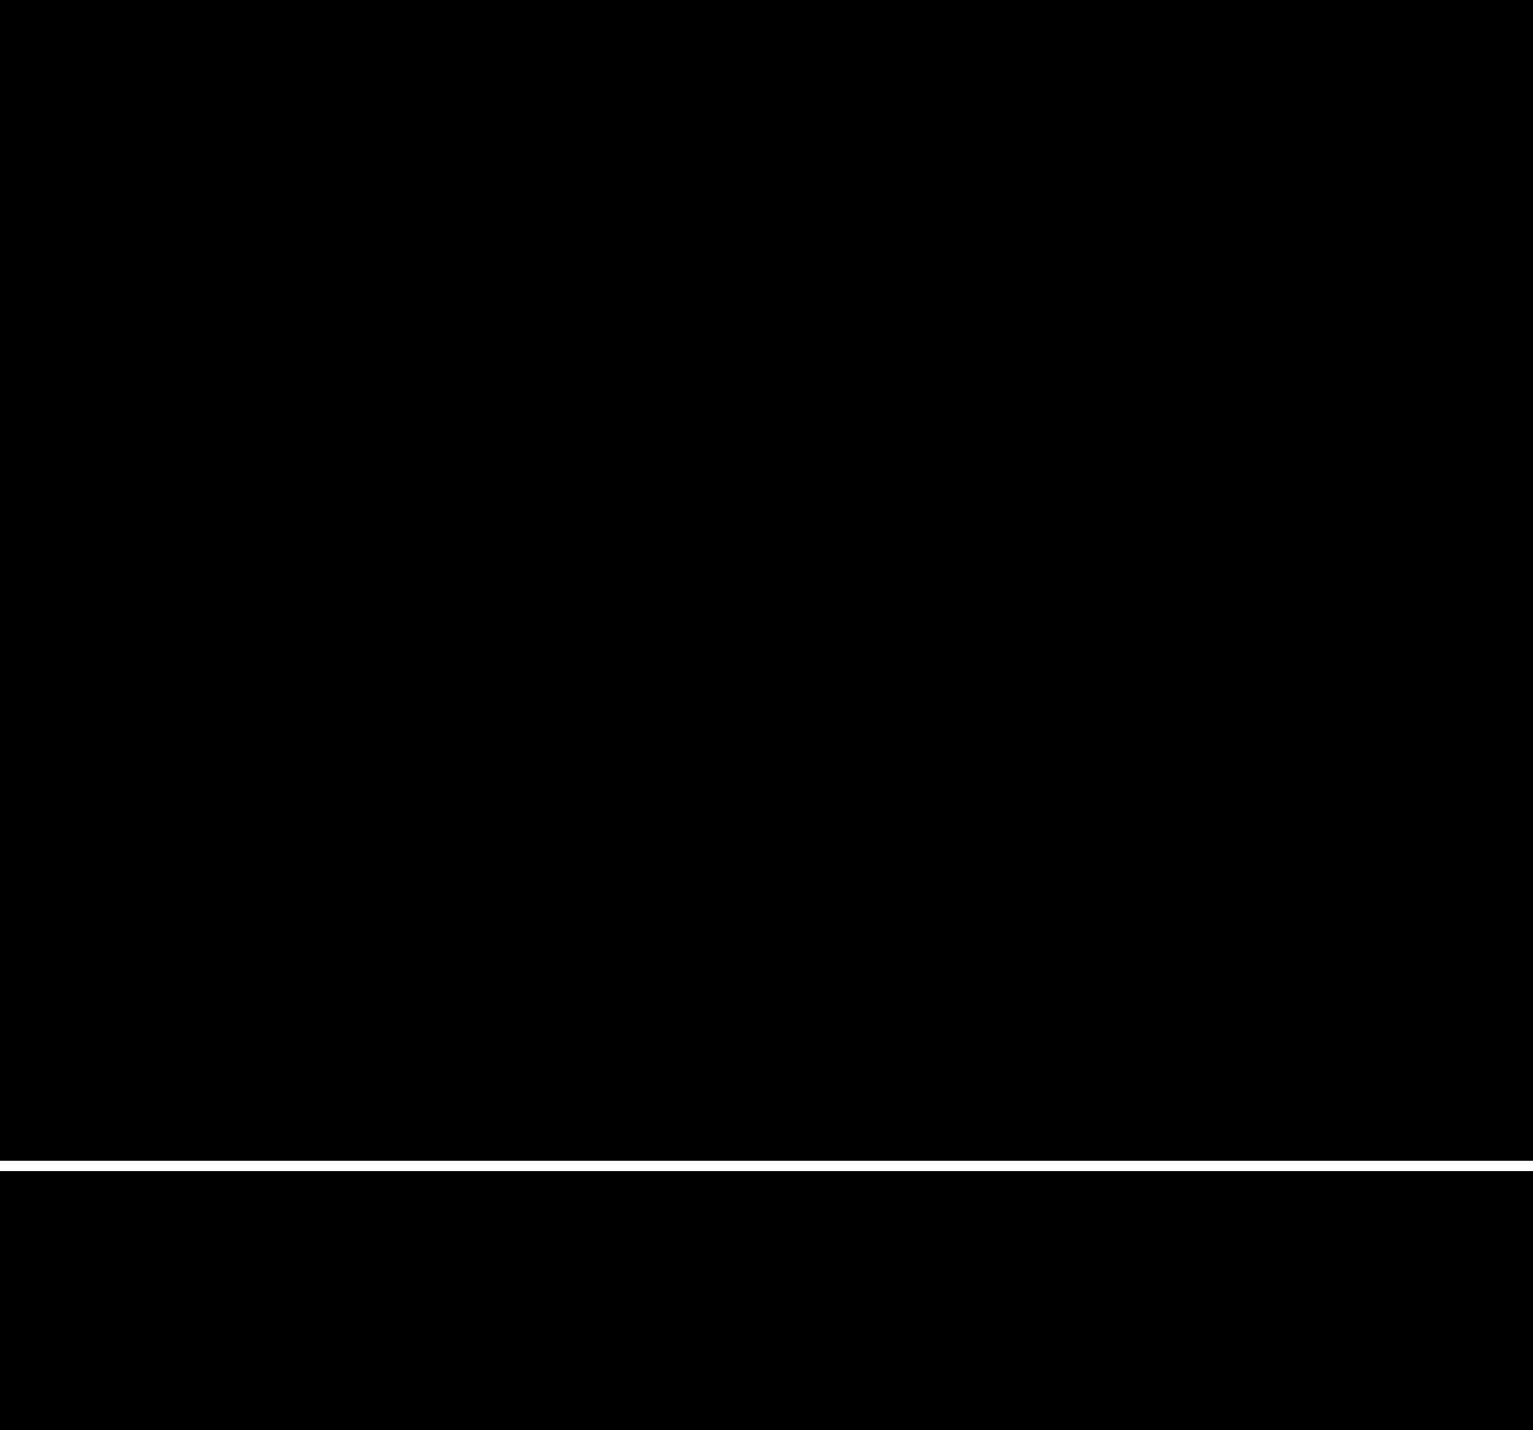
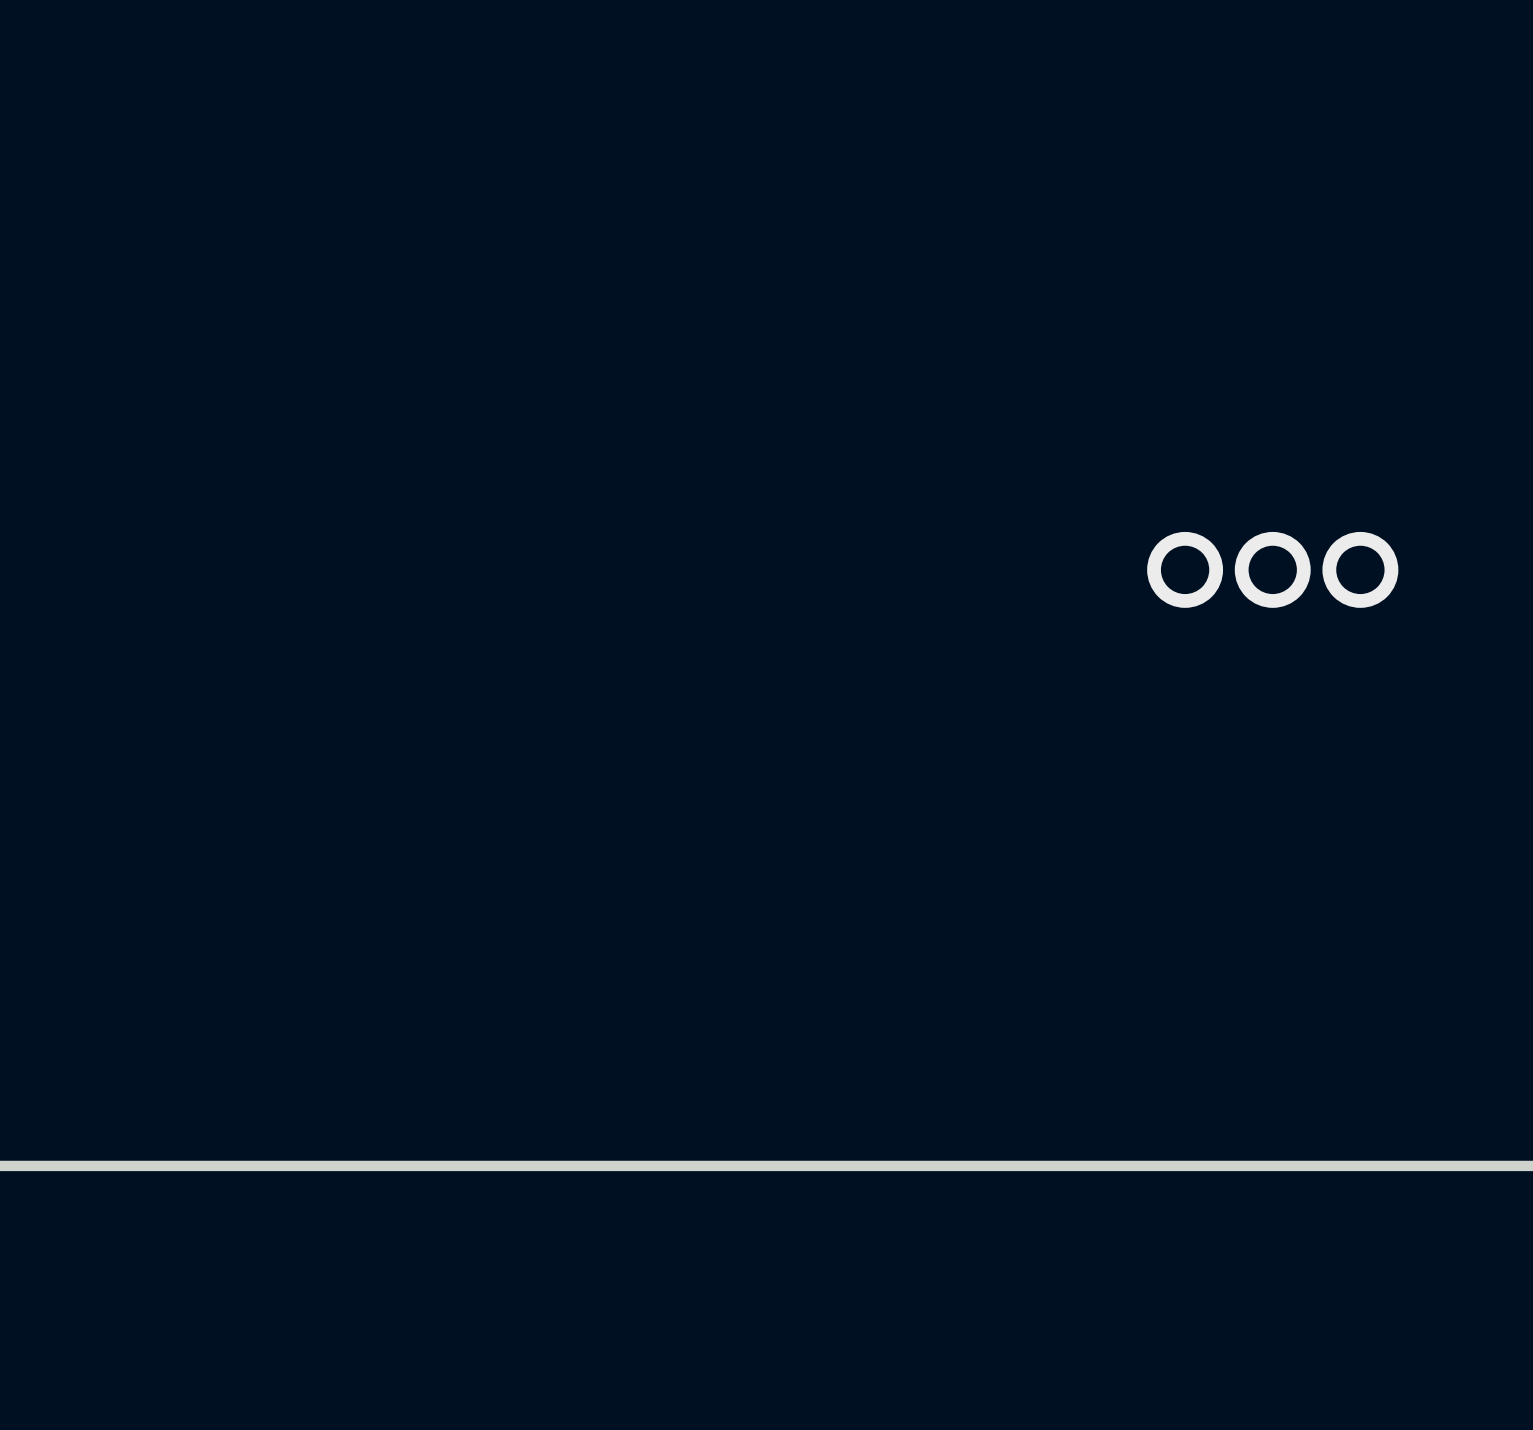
via: none -> (1185, 569)
via: none -> (1272, 569)
via: none -> (1360, 569)

